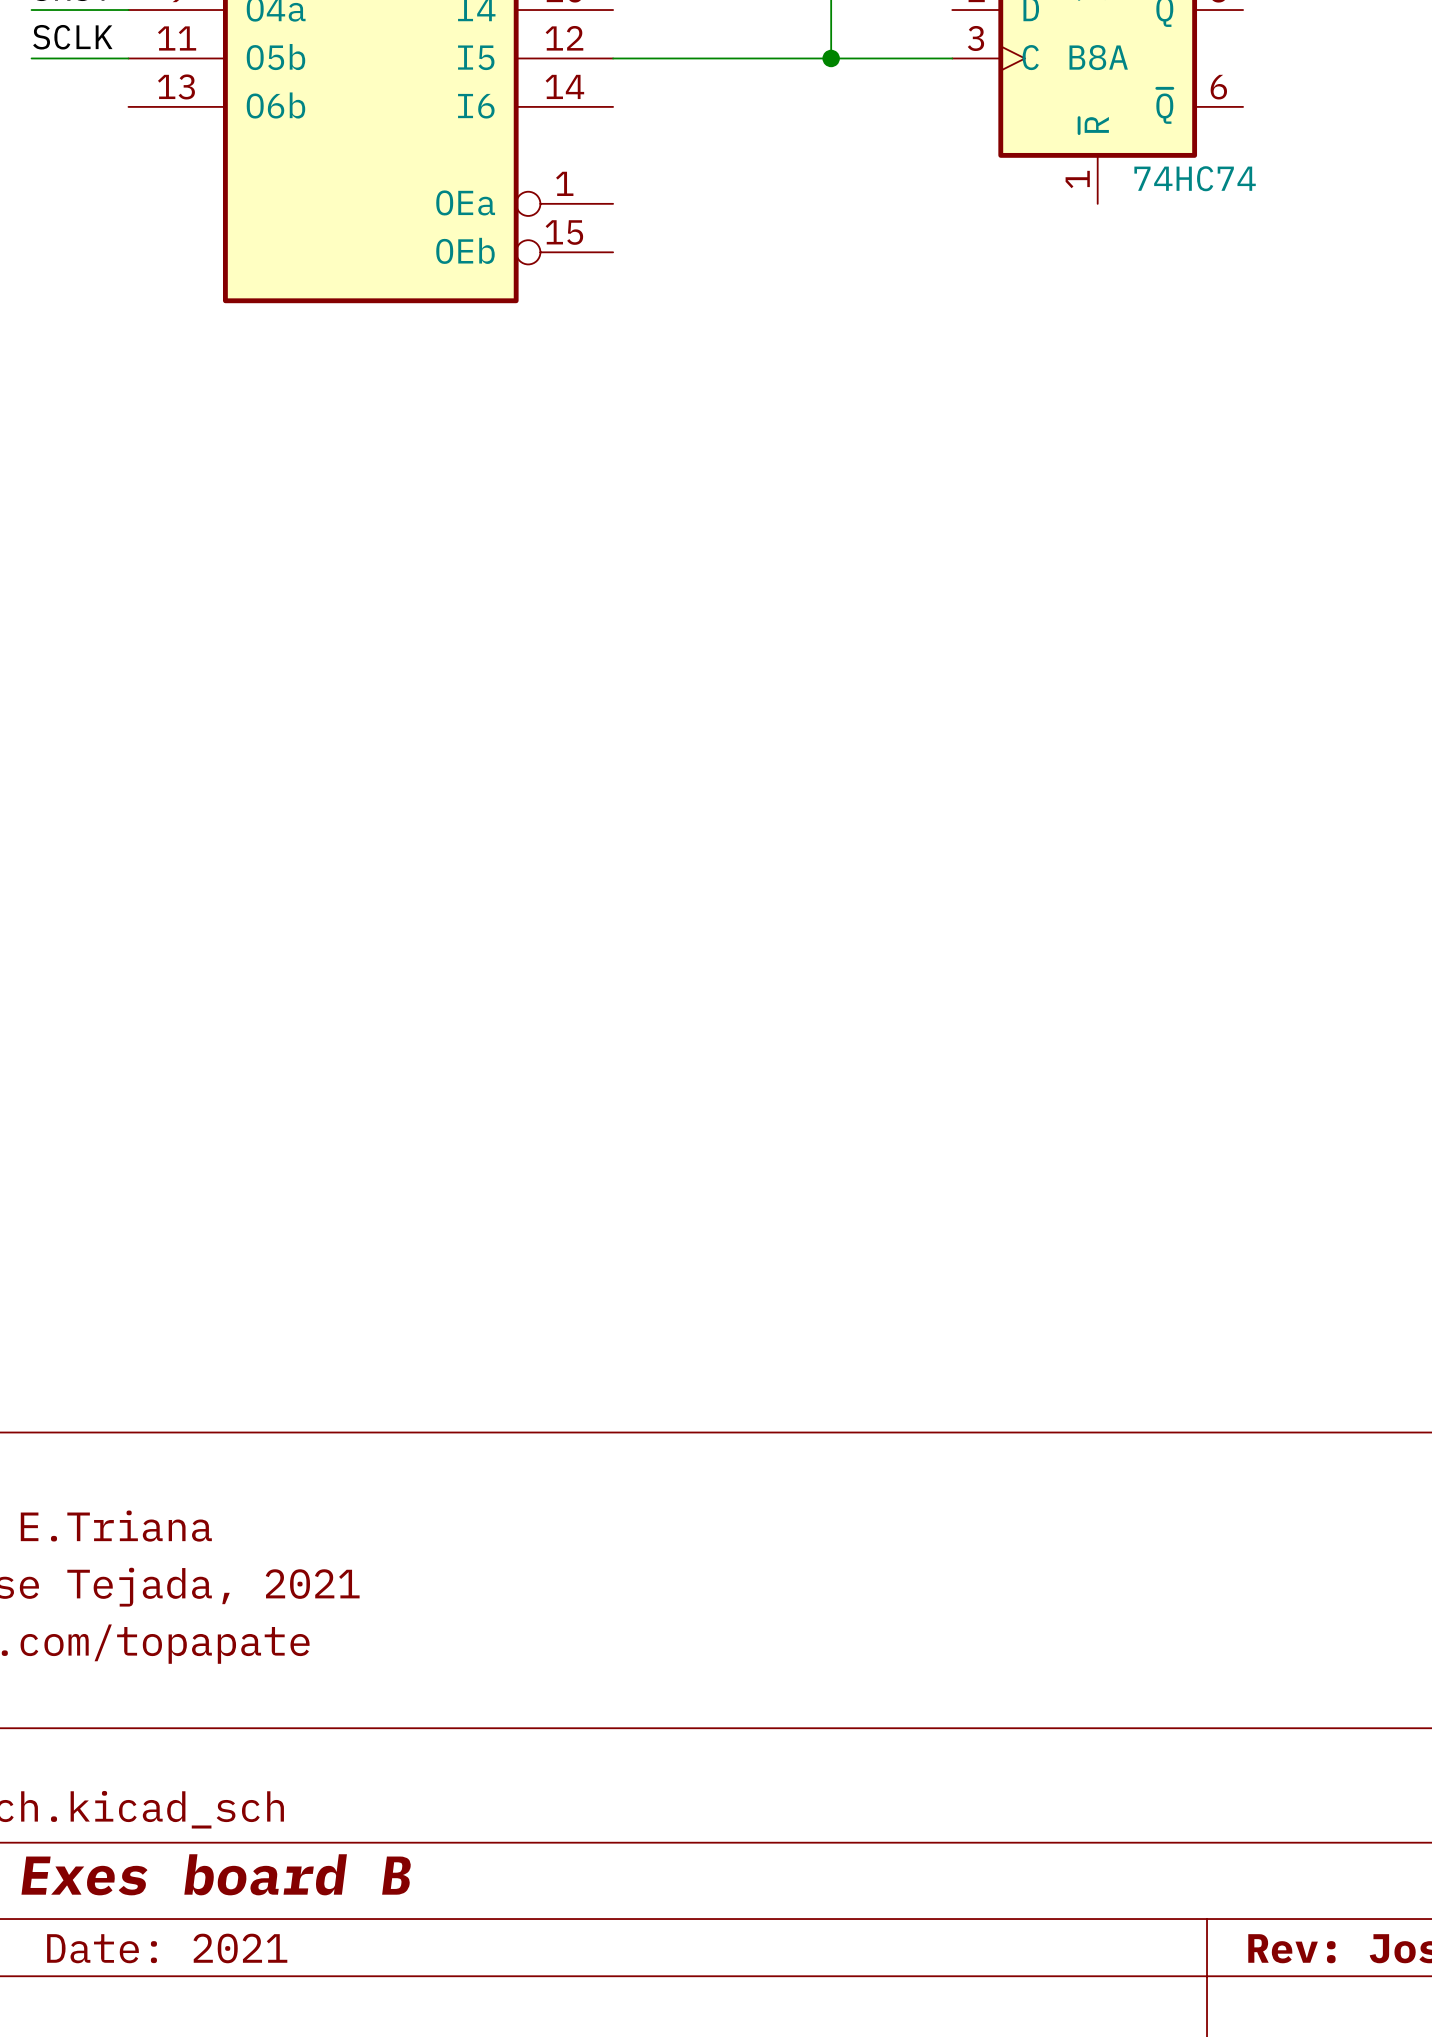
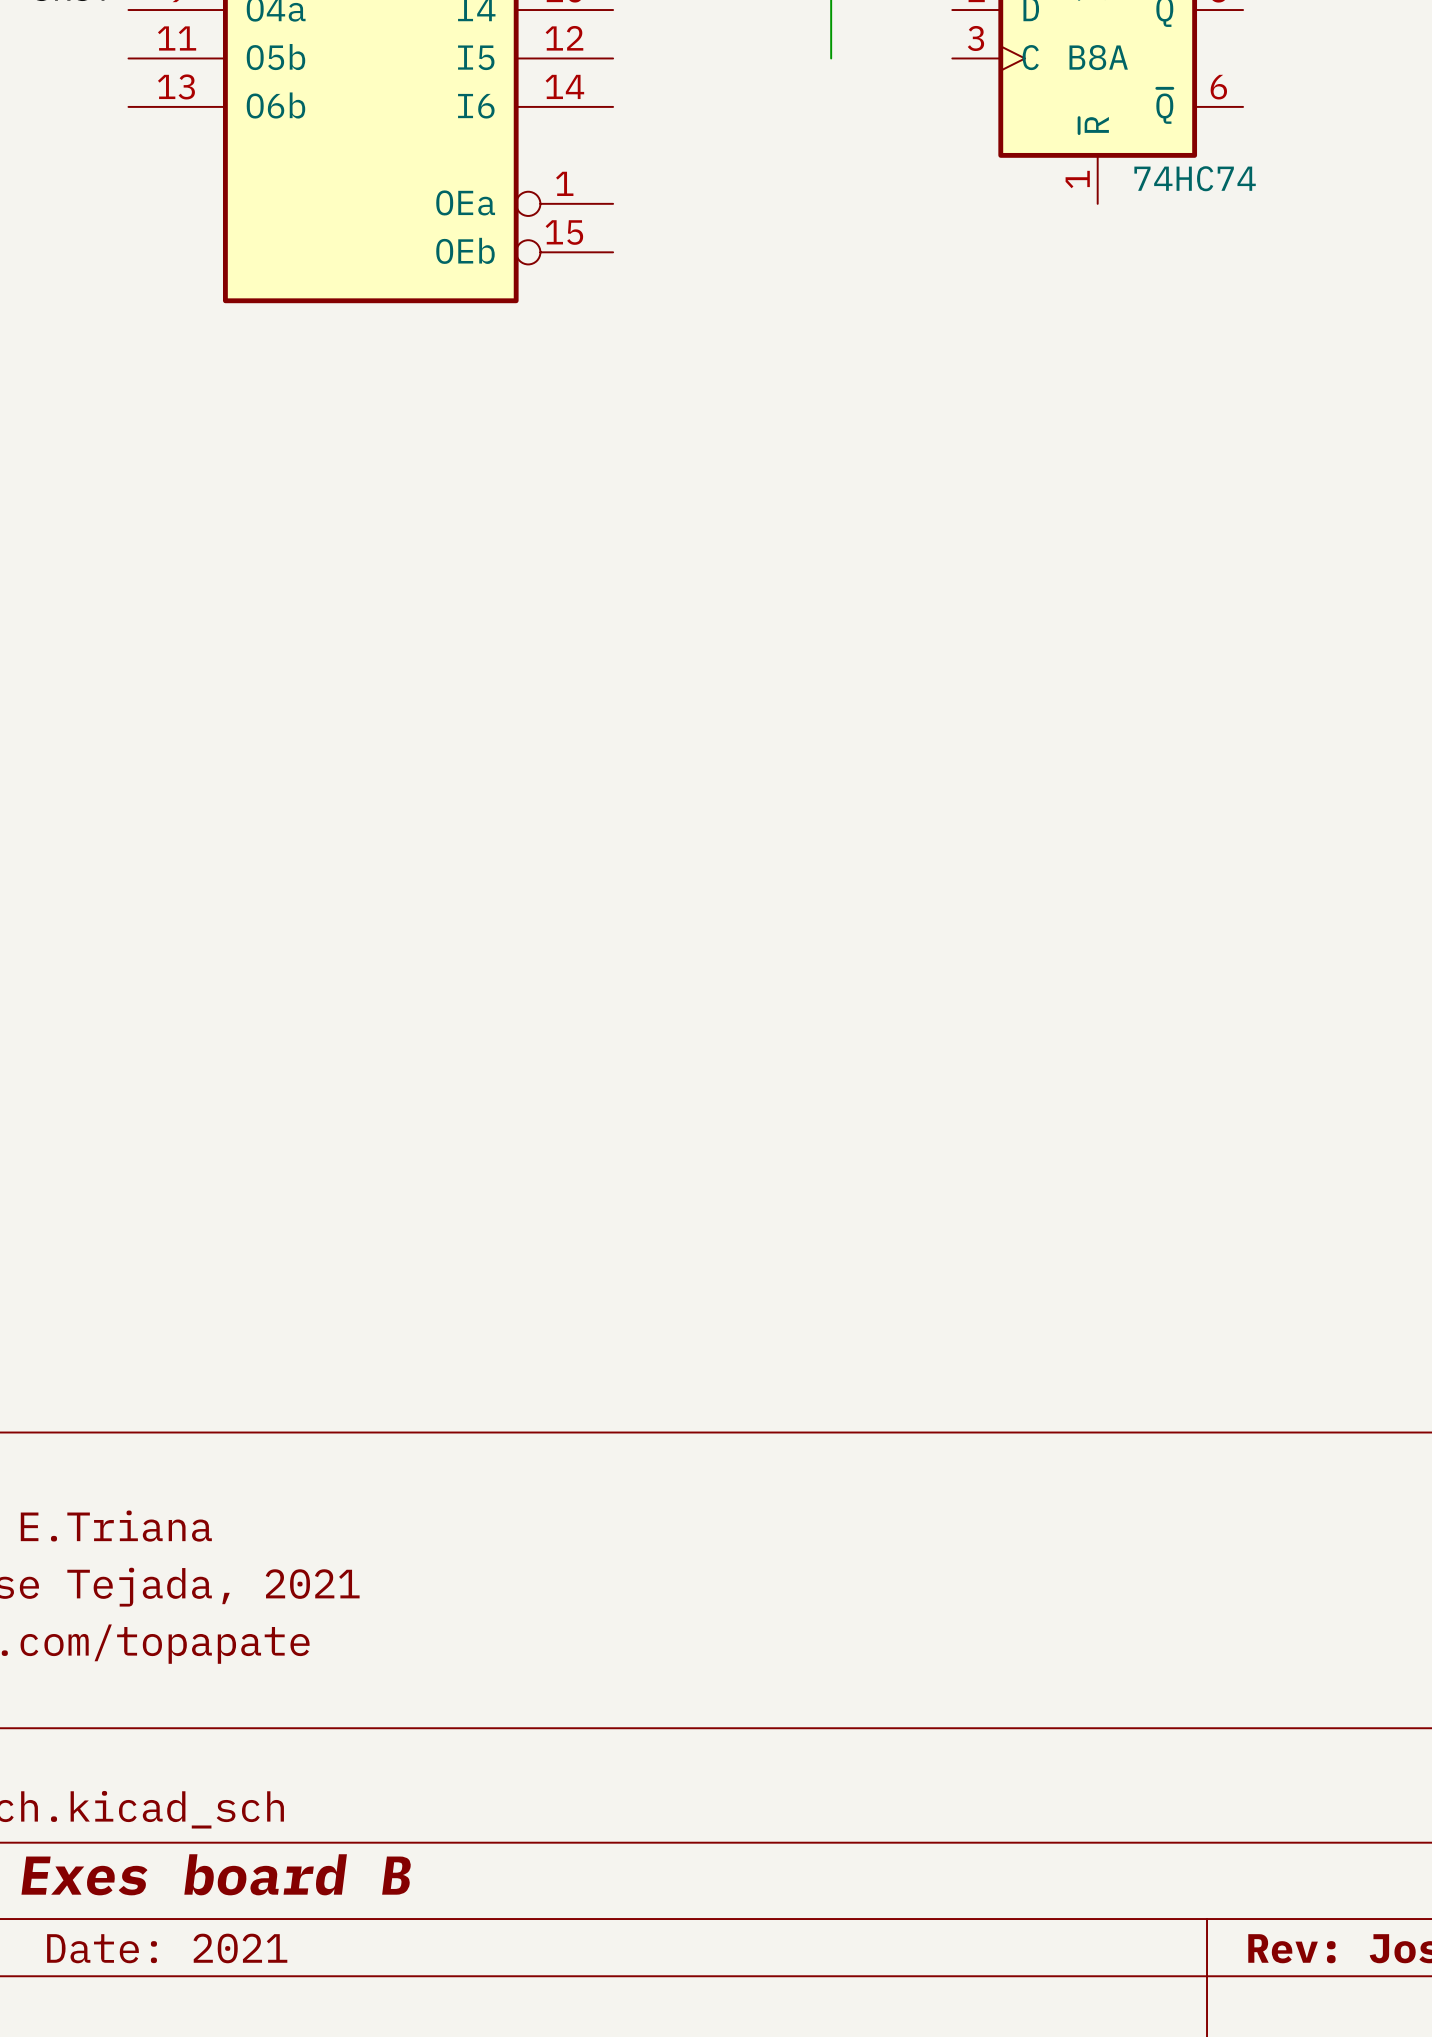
wire: (31, 10) (128, 10) -> none
label: SCLK (72, 37) -> none
wire: (31, 58) (128, 58) -> none
wire: (613, 58) (952, 58) -> none
junction: (831, 58) -> none

